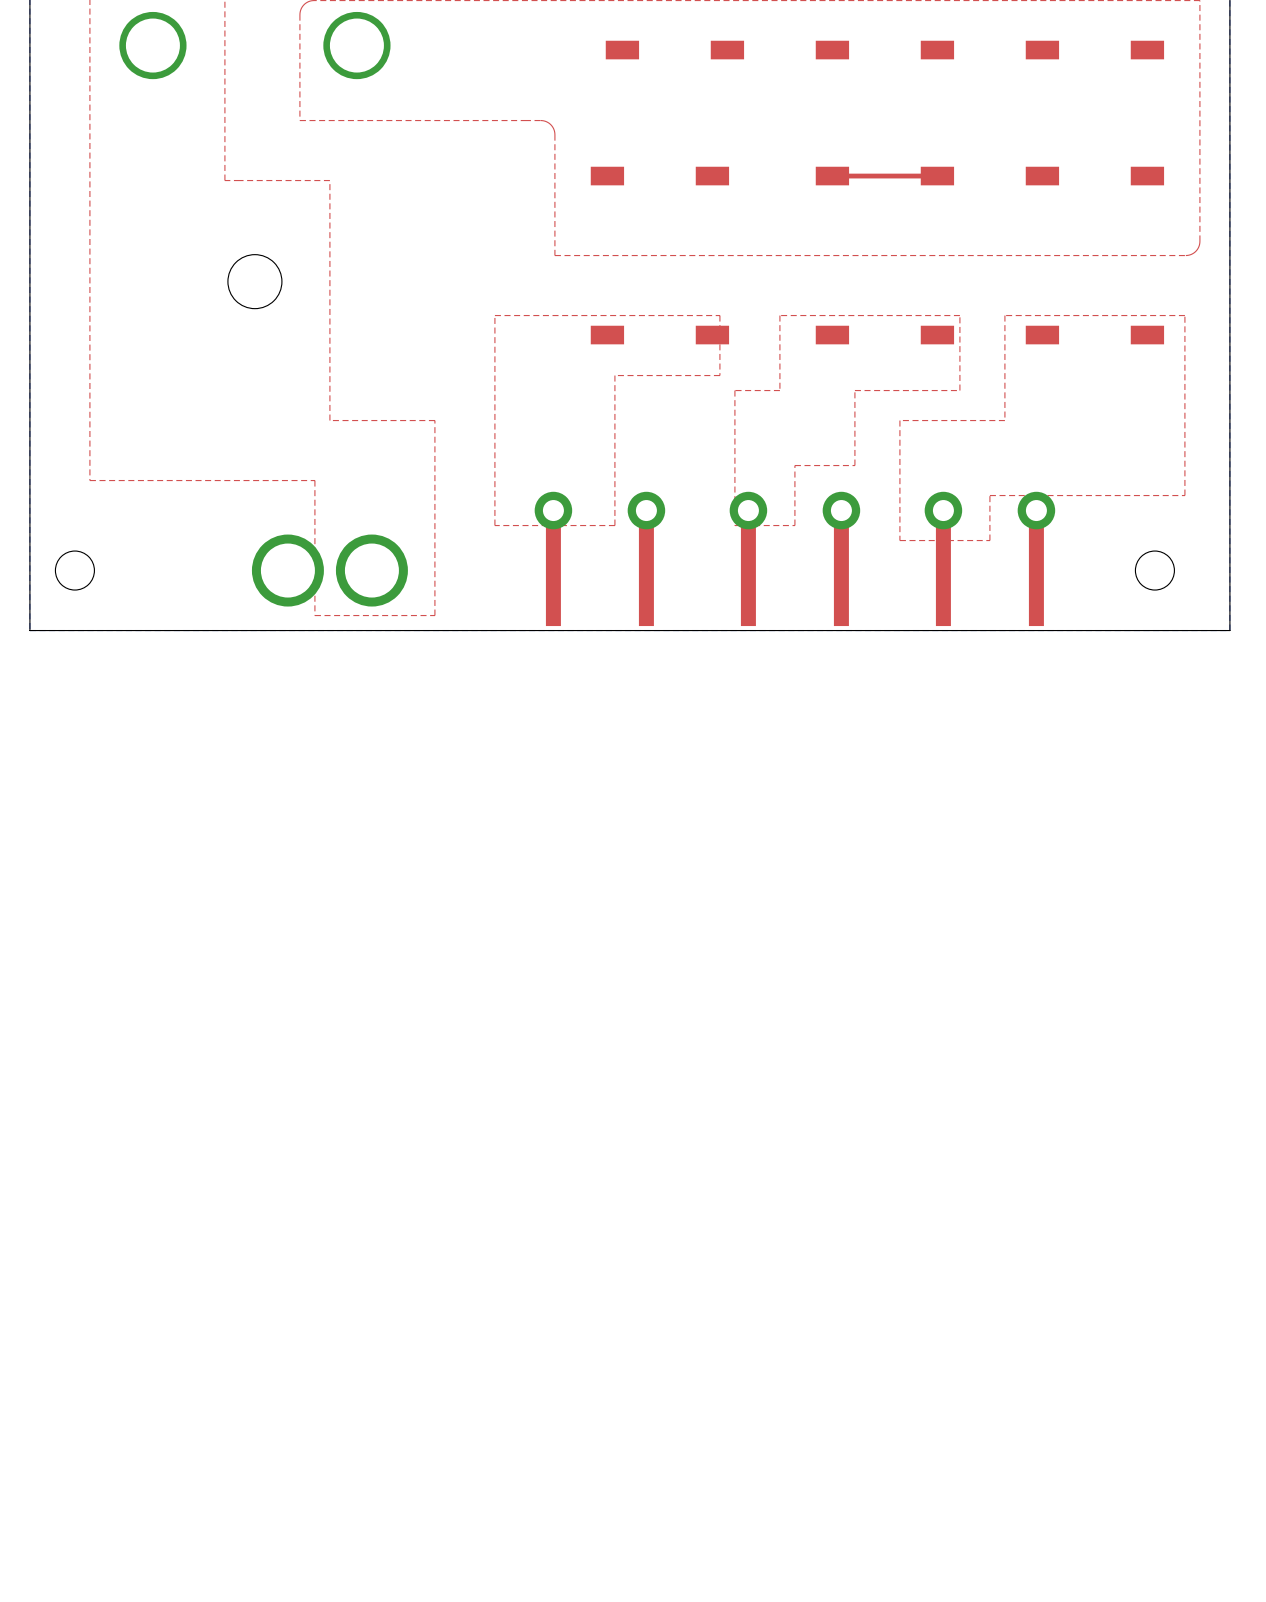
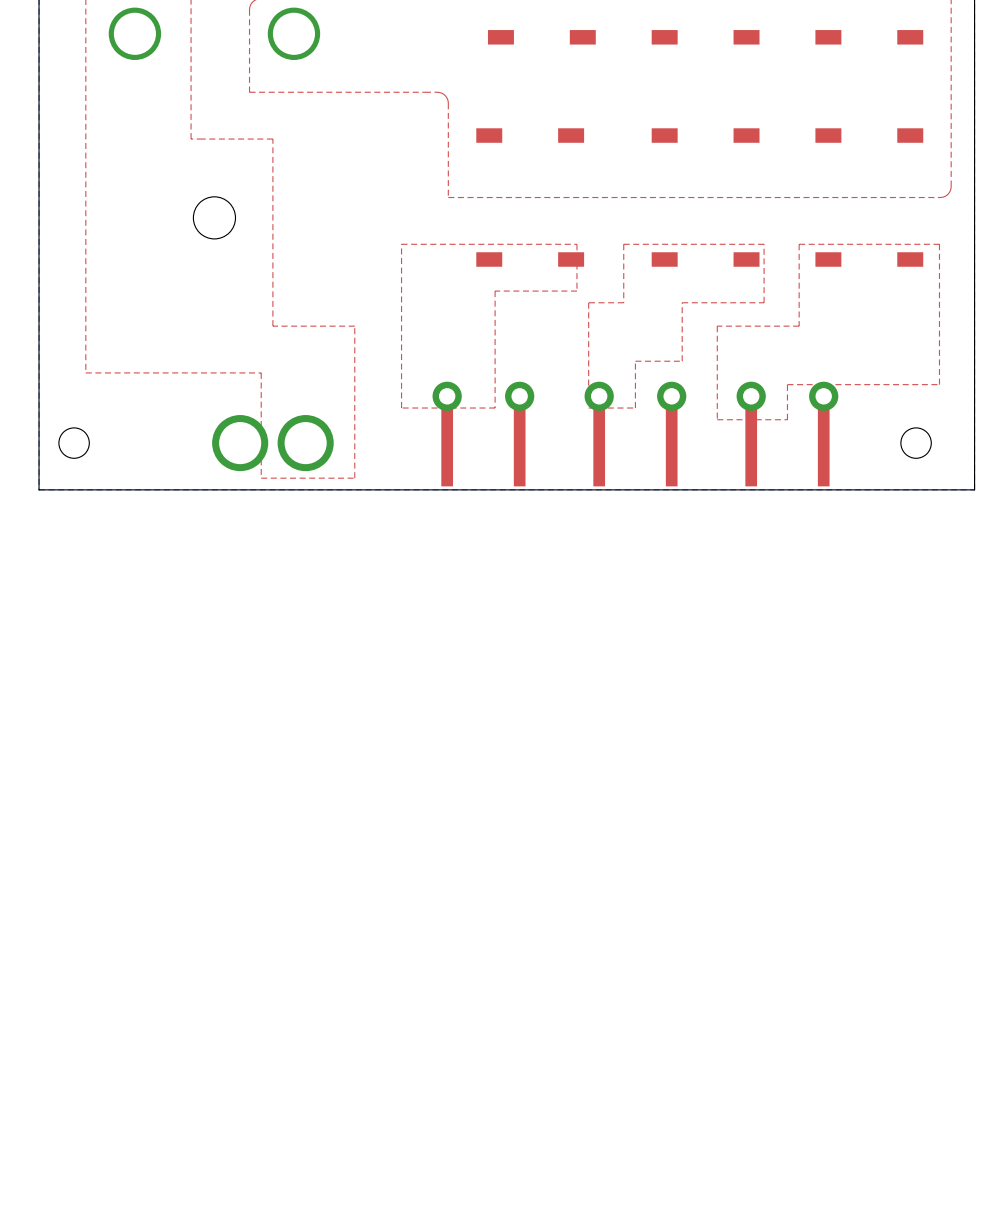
top track: (937, 176) (832, 176) -> none

